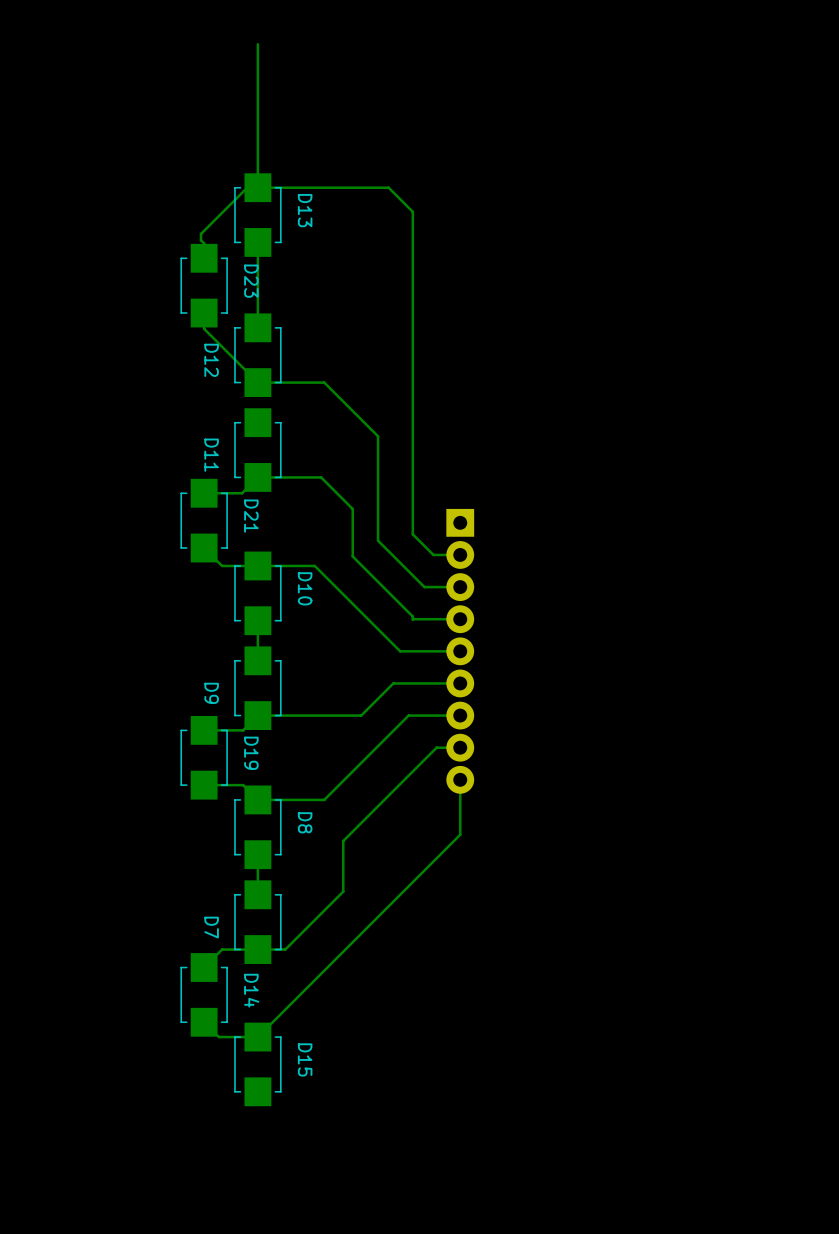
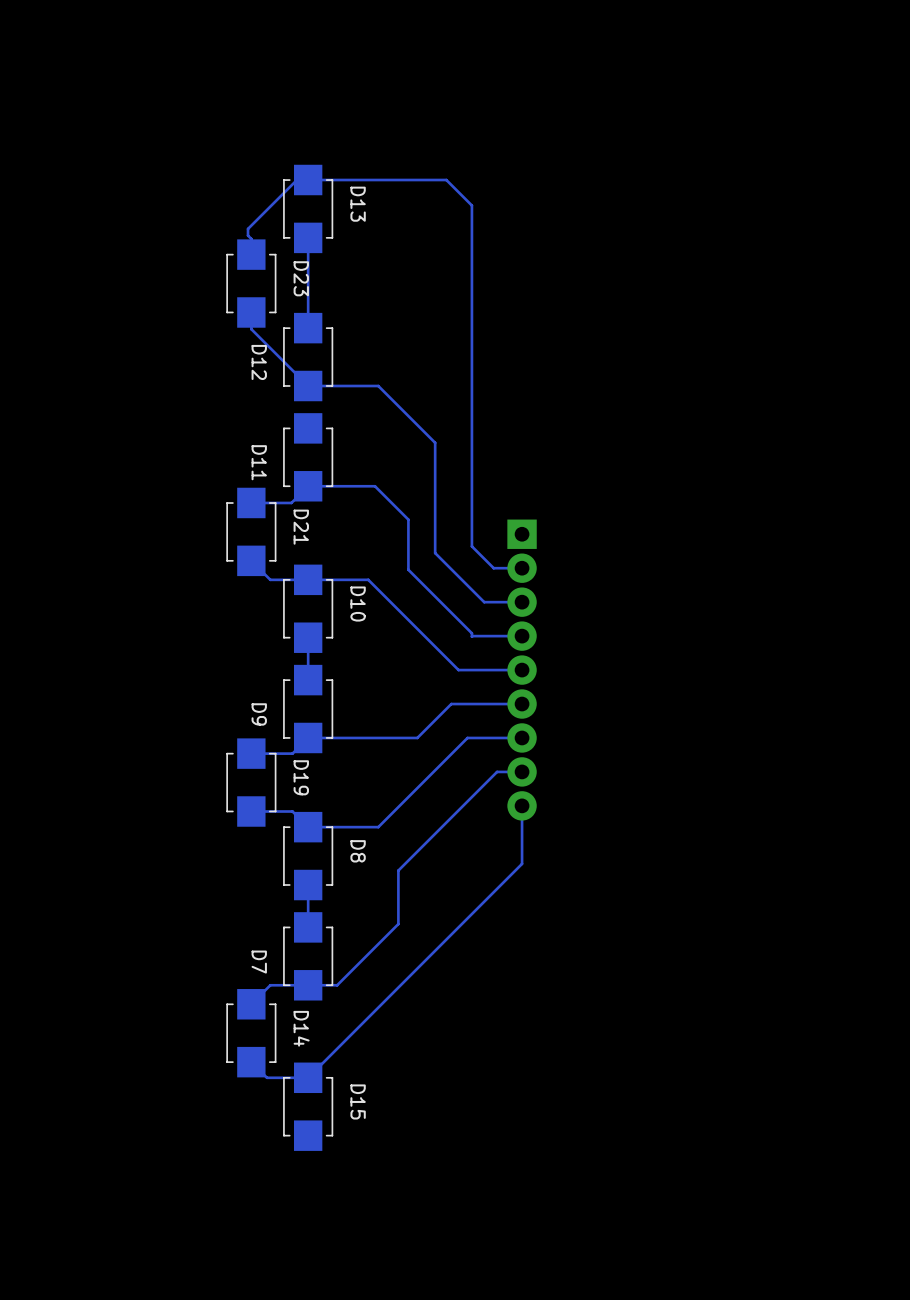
bottom track: (257, 44) (257, 187) -> none

